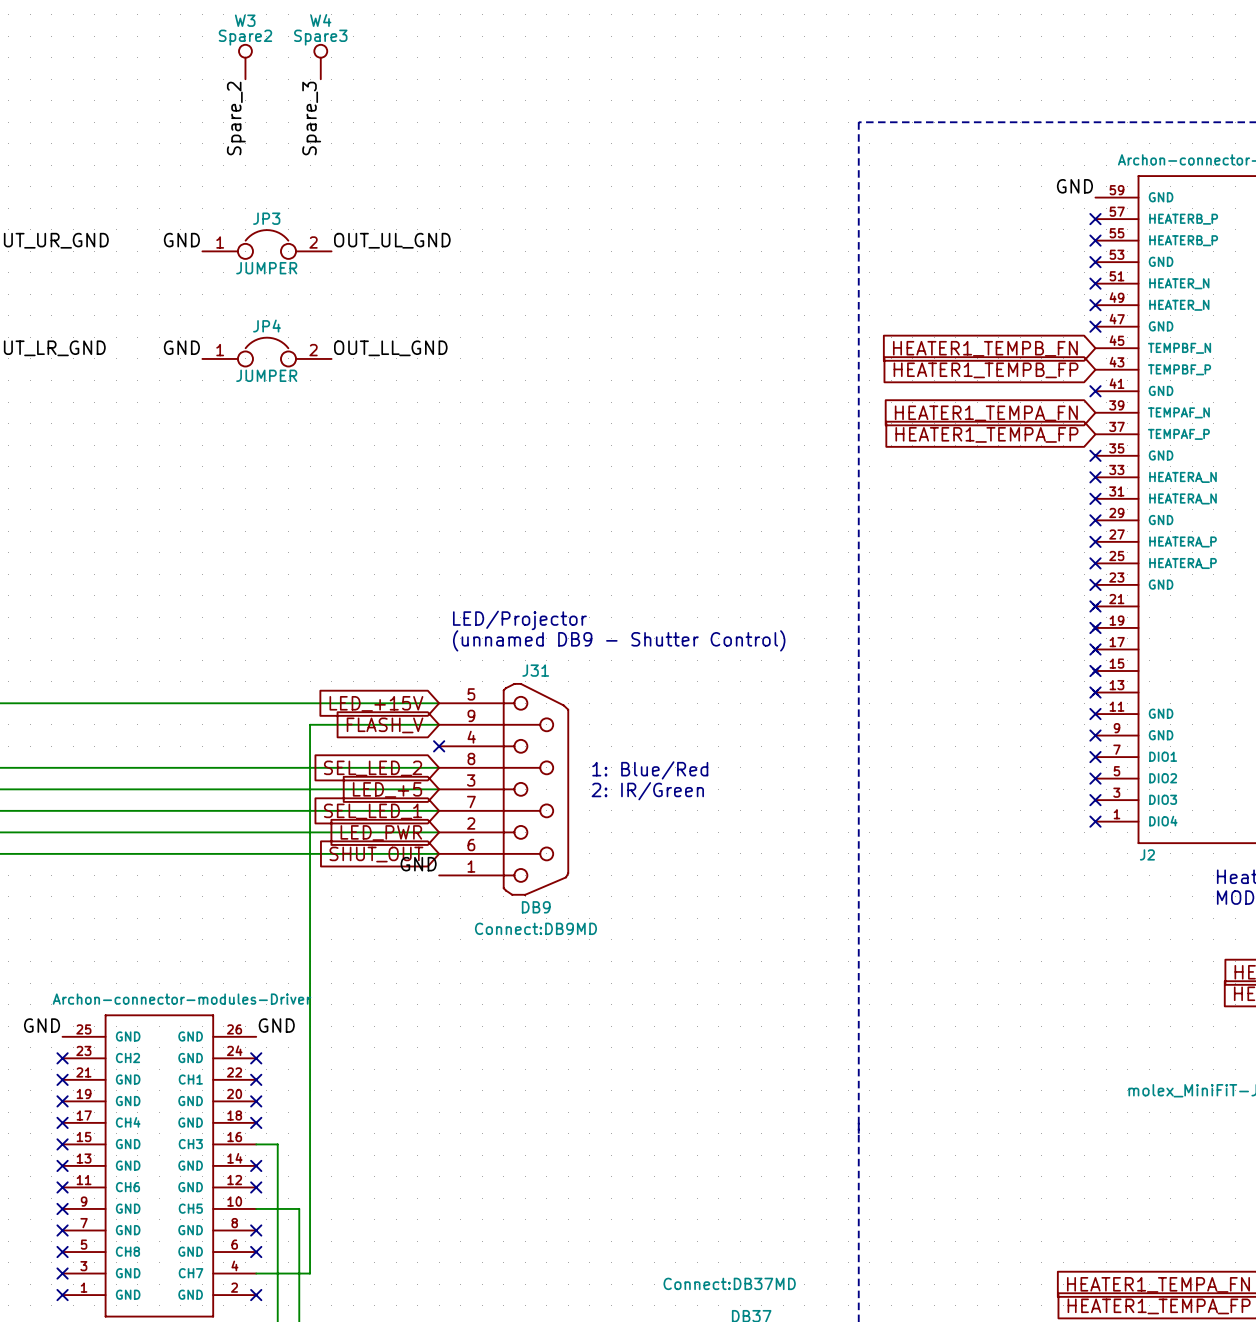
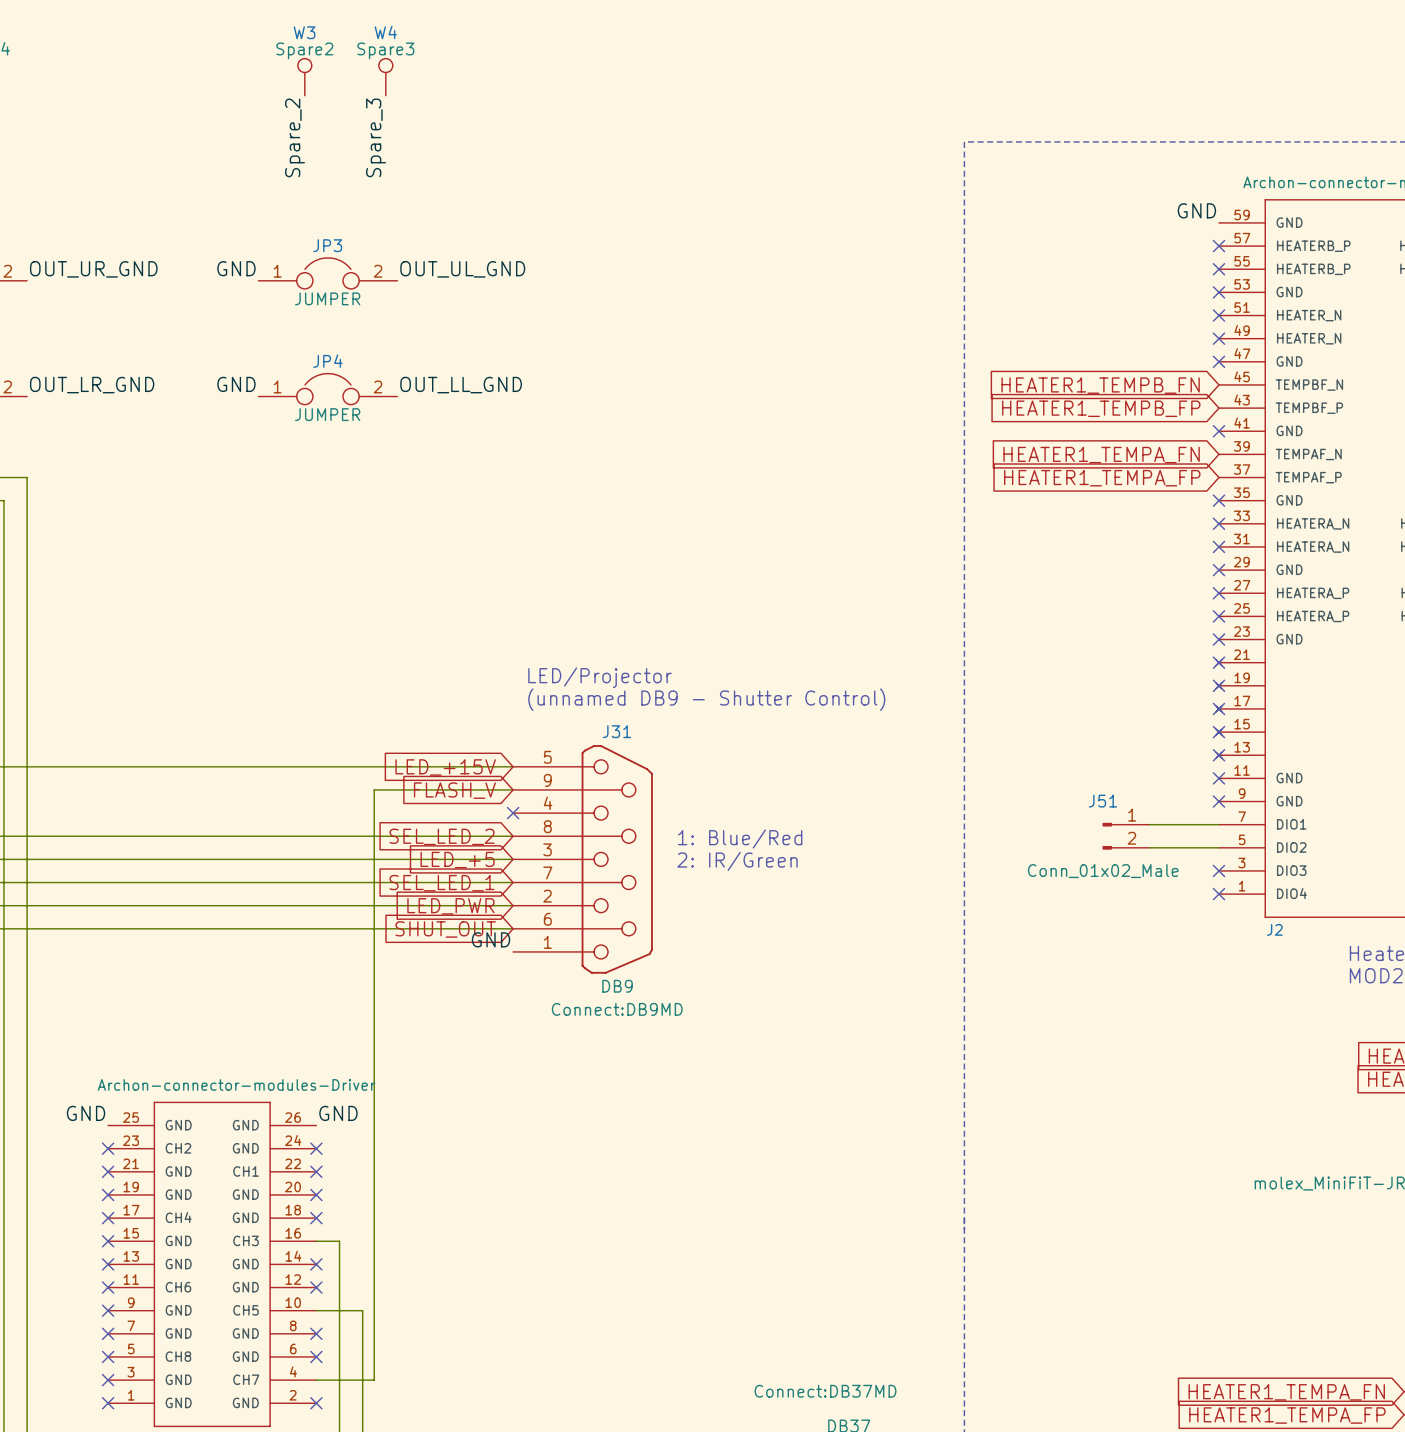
wire: none -> (1149, 824) (1218, 824)
no-connect mark: (1095, 757) -> none
J51: none -> Conn_01x02_Male (1126, 836)
wire: none -> (1149, 847) (1218, 847)
no-connect mark: (1095, 778) -> none

